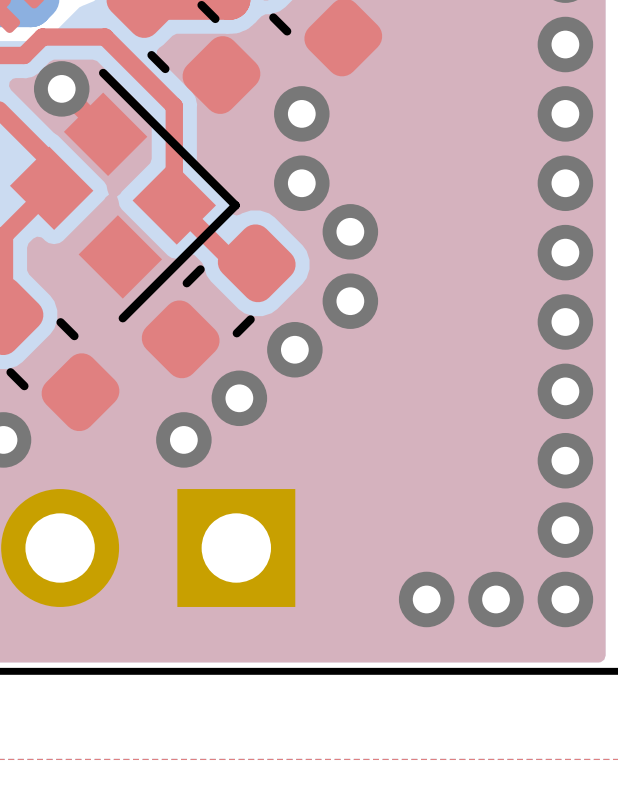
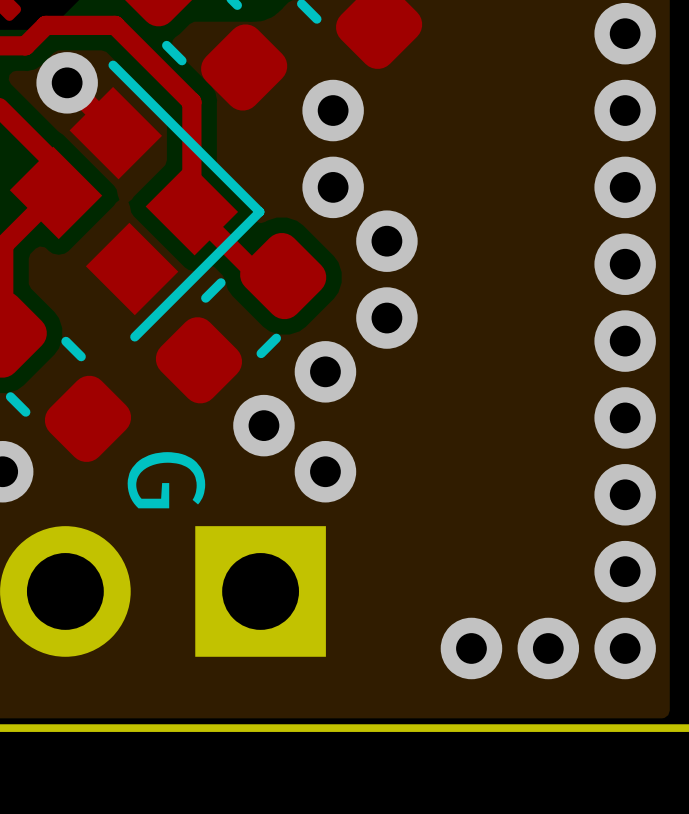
text: none -> G (166, 480)
via position: (183, 439) -> (325, 471)

